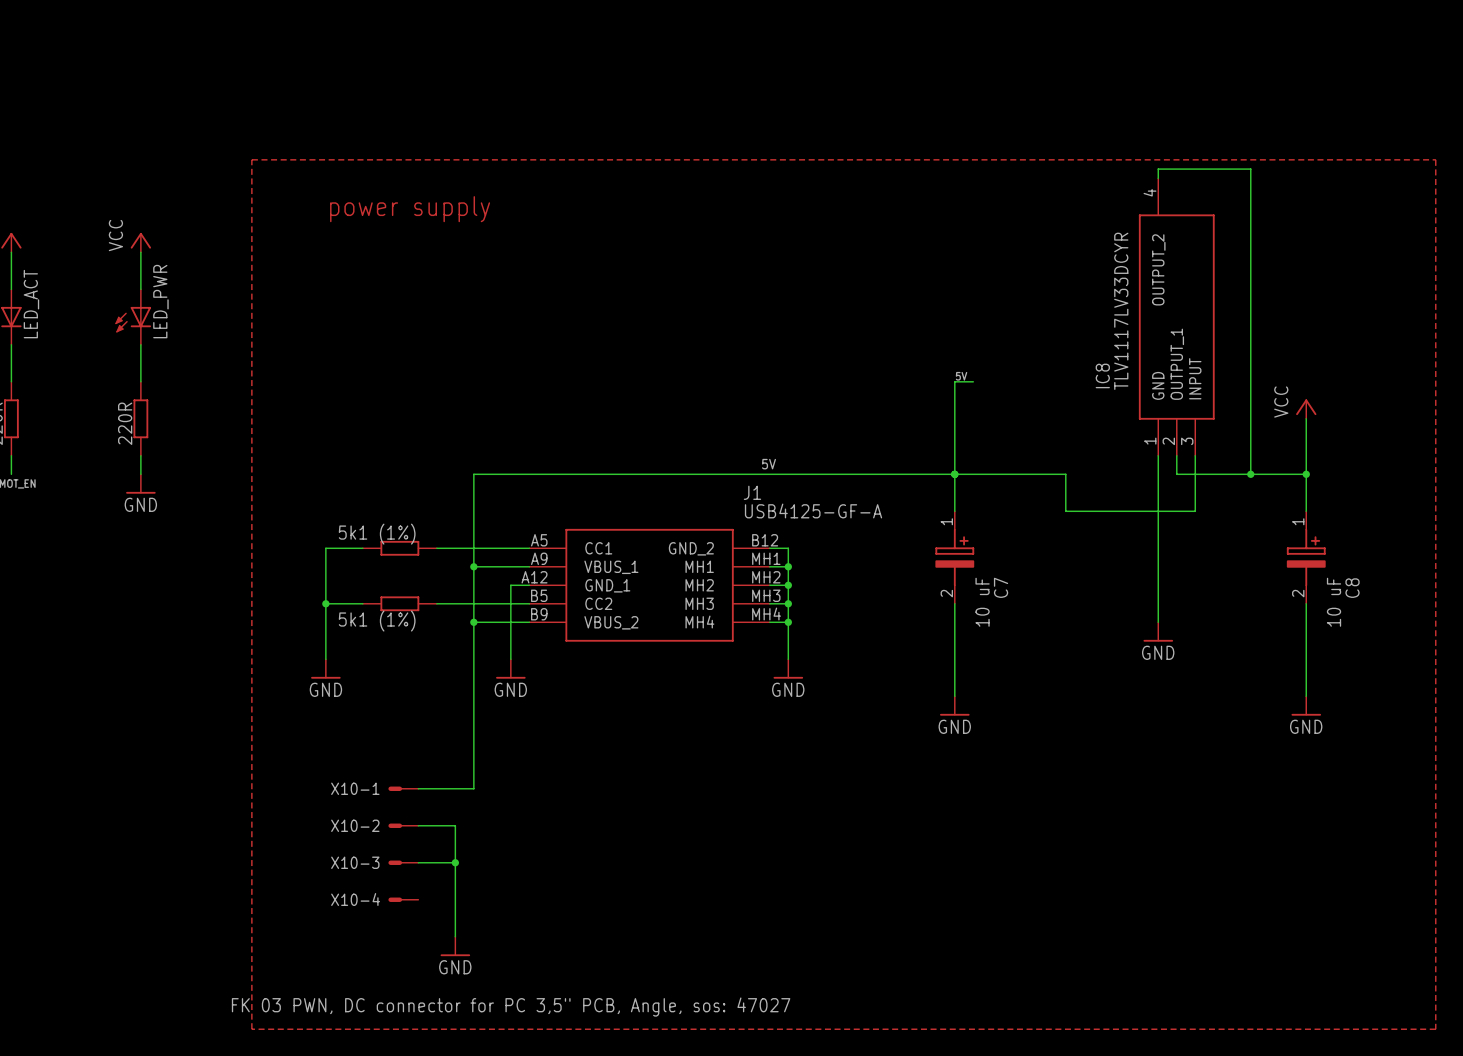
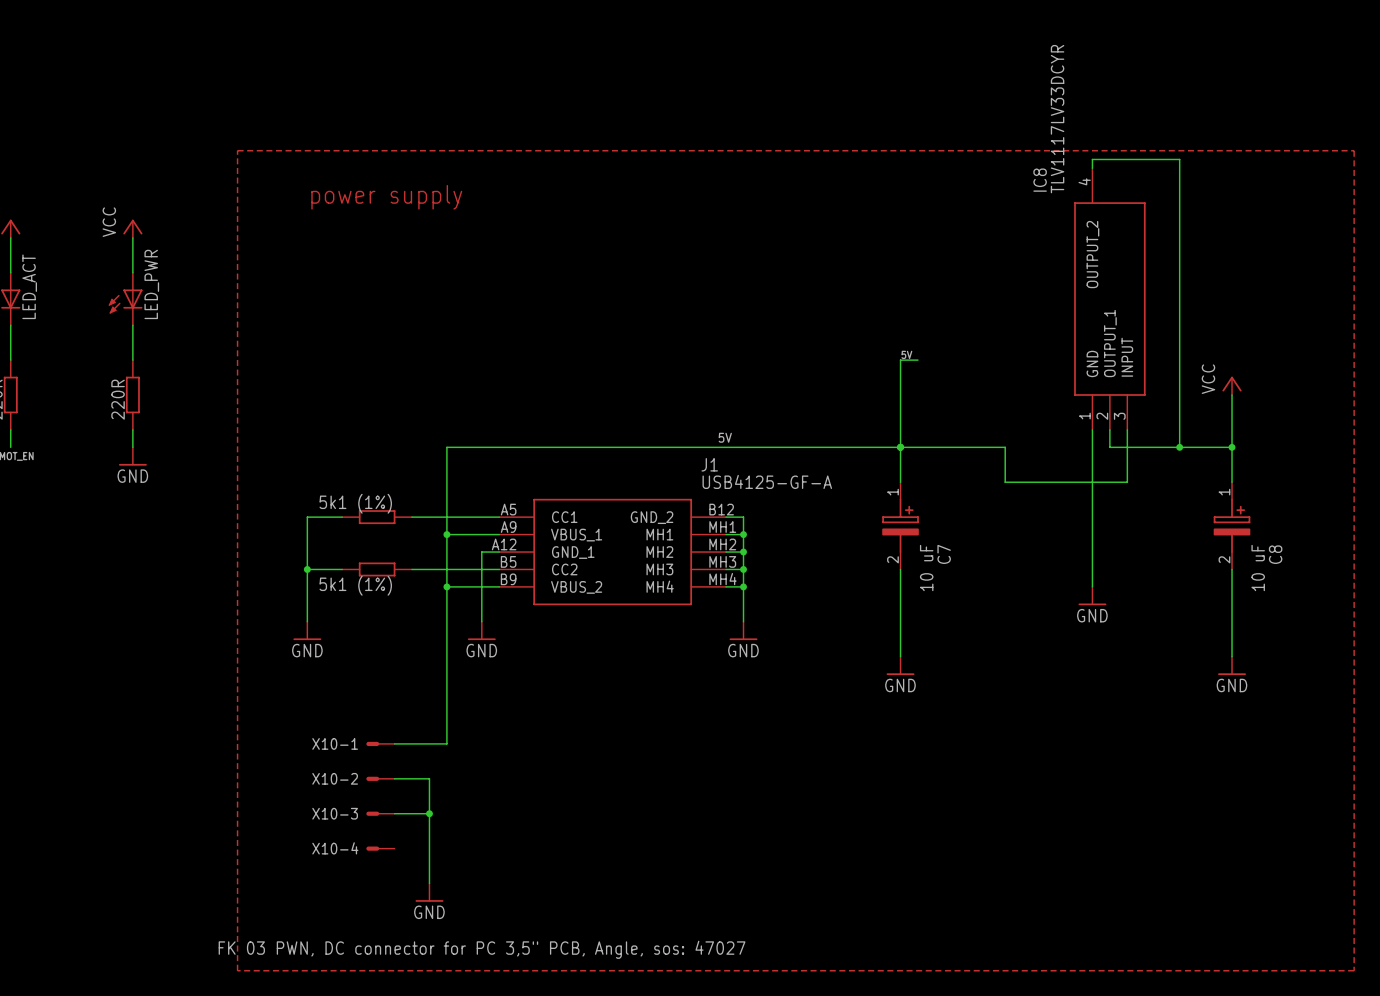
IC8 value position: TLV1117LV33DCYR (1121, 311) -> TLV1117LV33DCYR (1057, 119)
IC8 name position: IC8 (1102, 375) -> IC8 (1040, 180)

